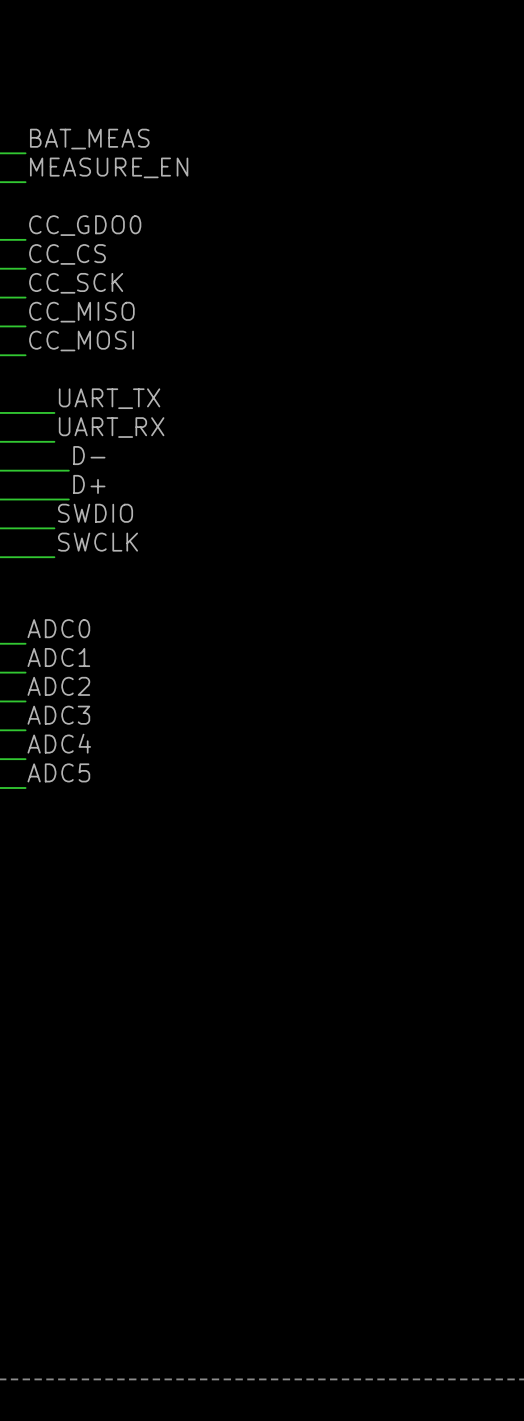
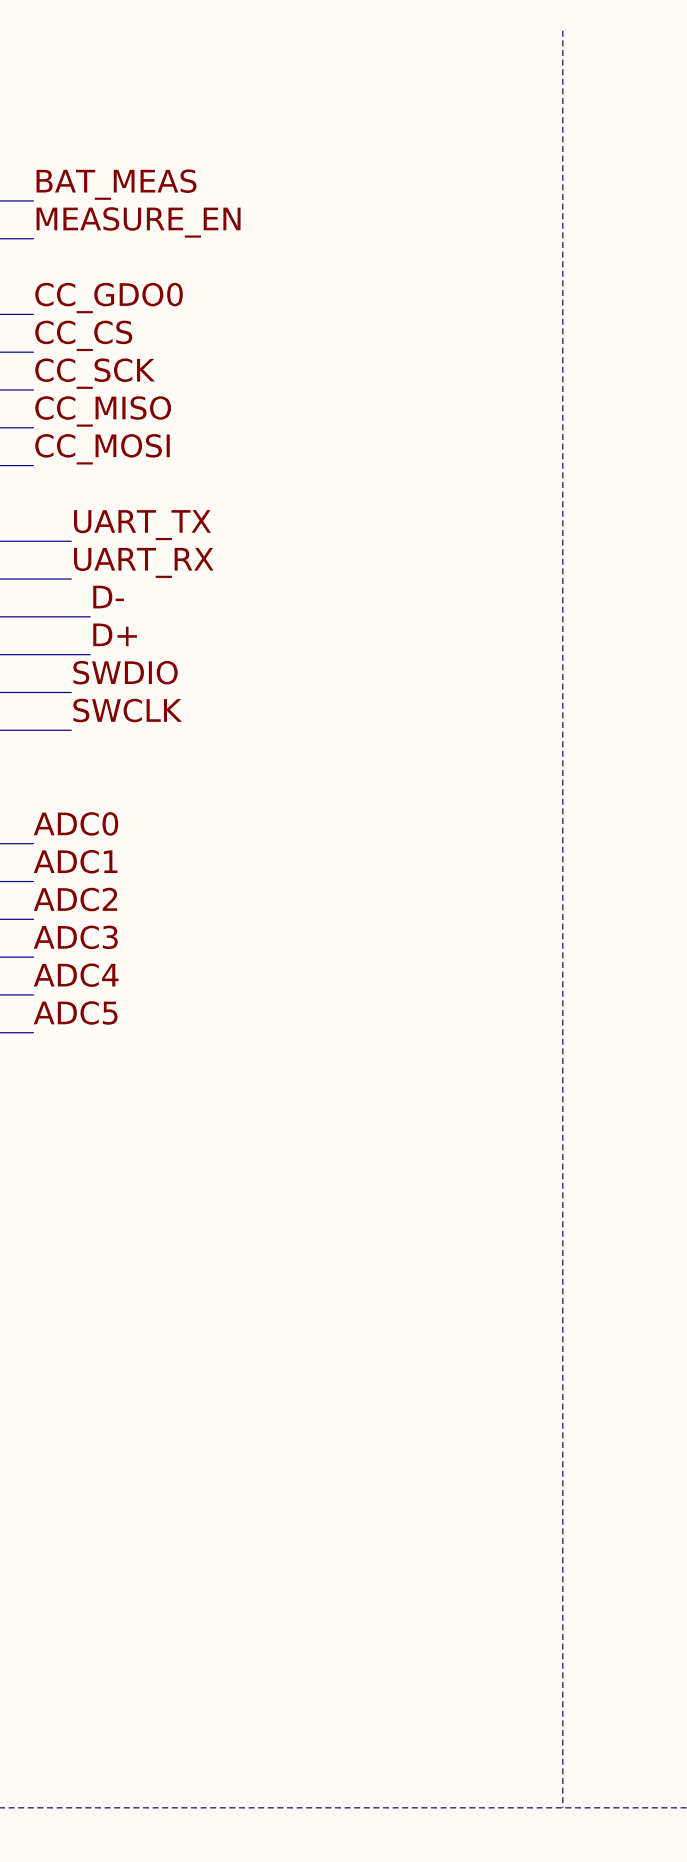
line: none -> (562, 30) (562, 1807)

